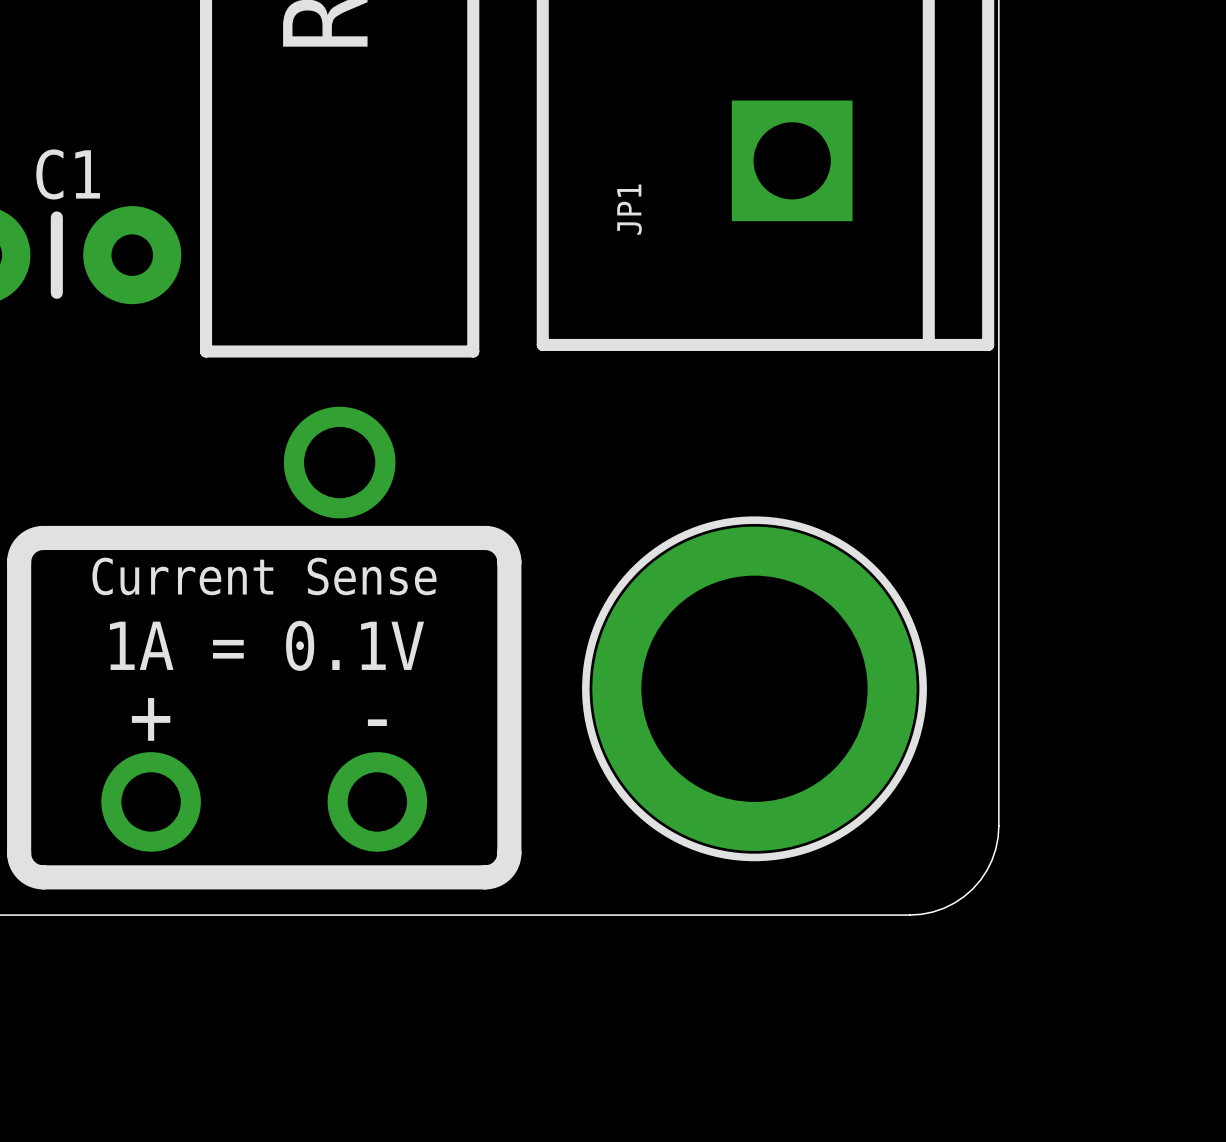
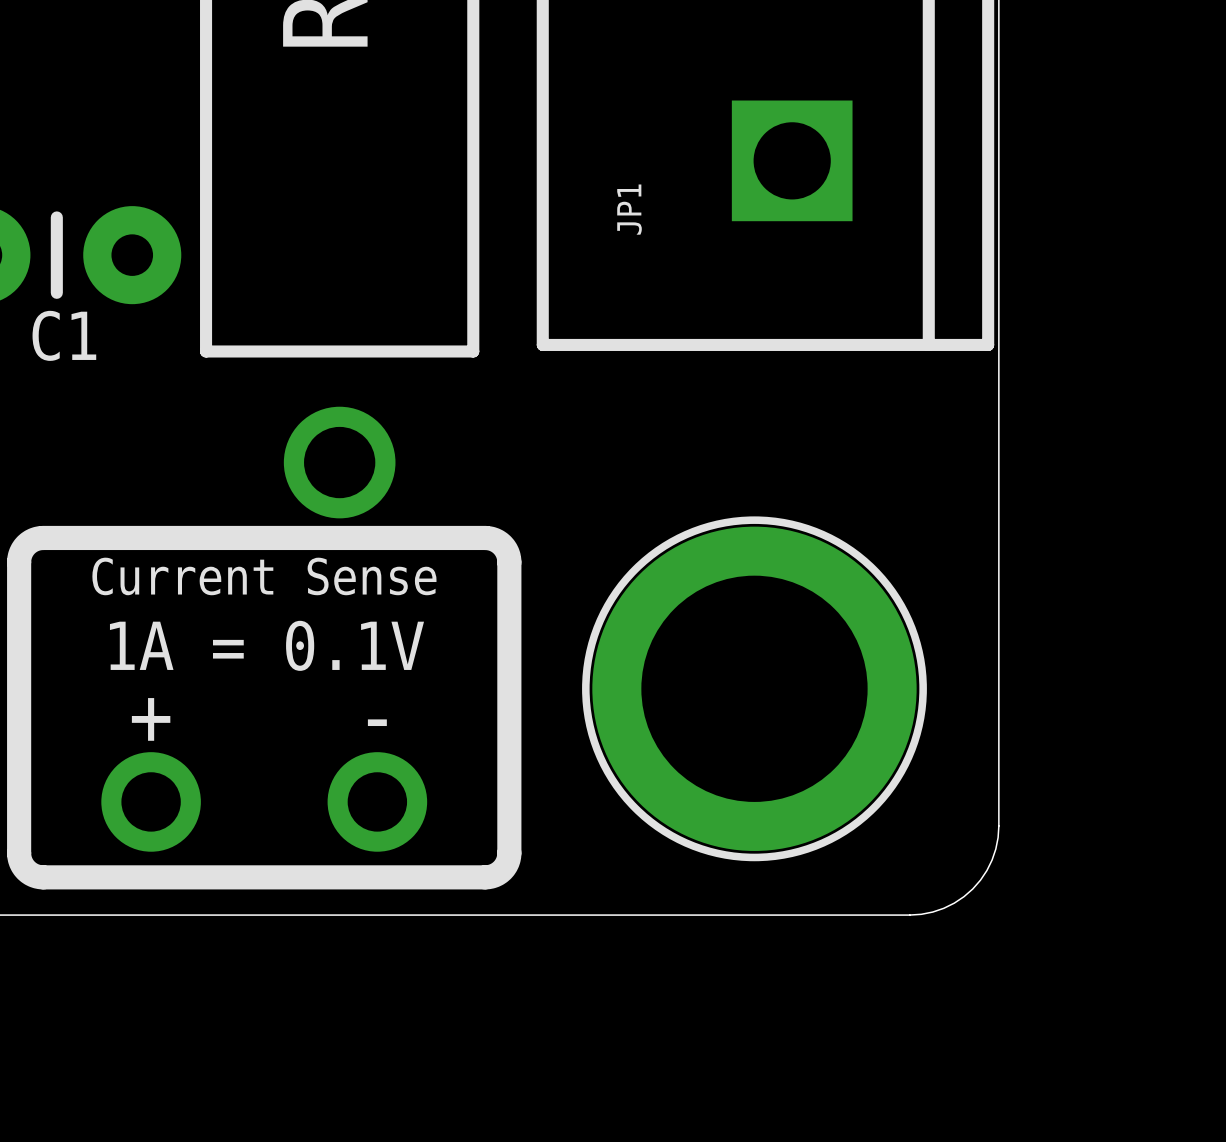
C1 name position: C1 (68, 174) -> C1 (64, 335)

